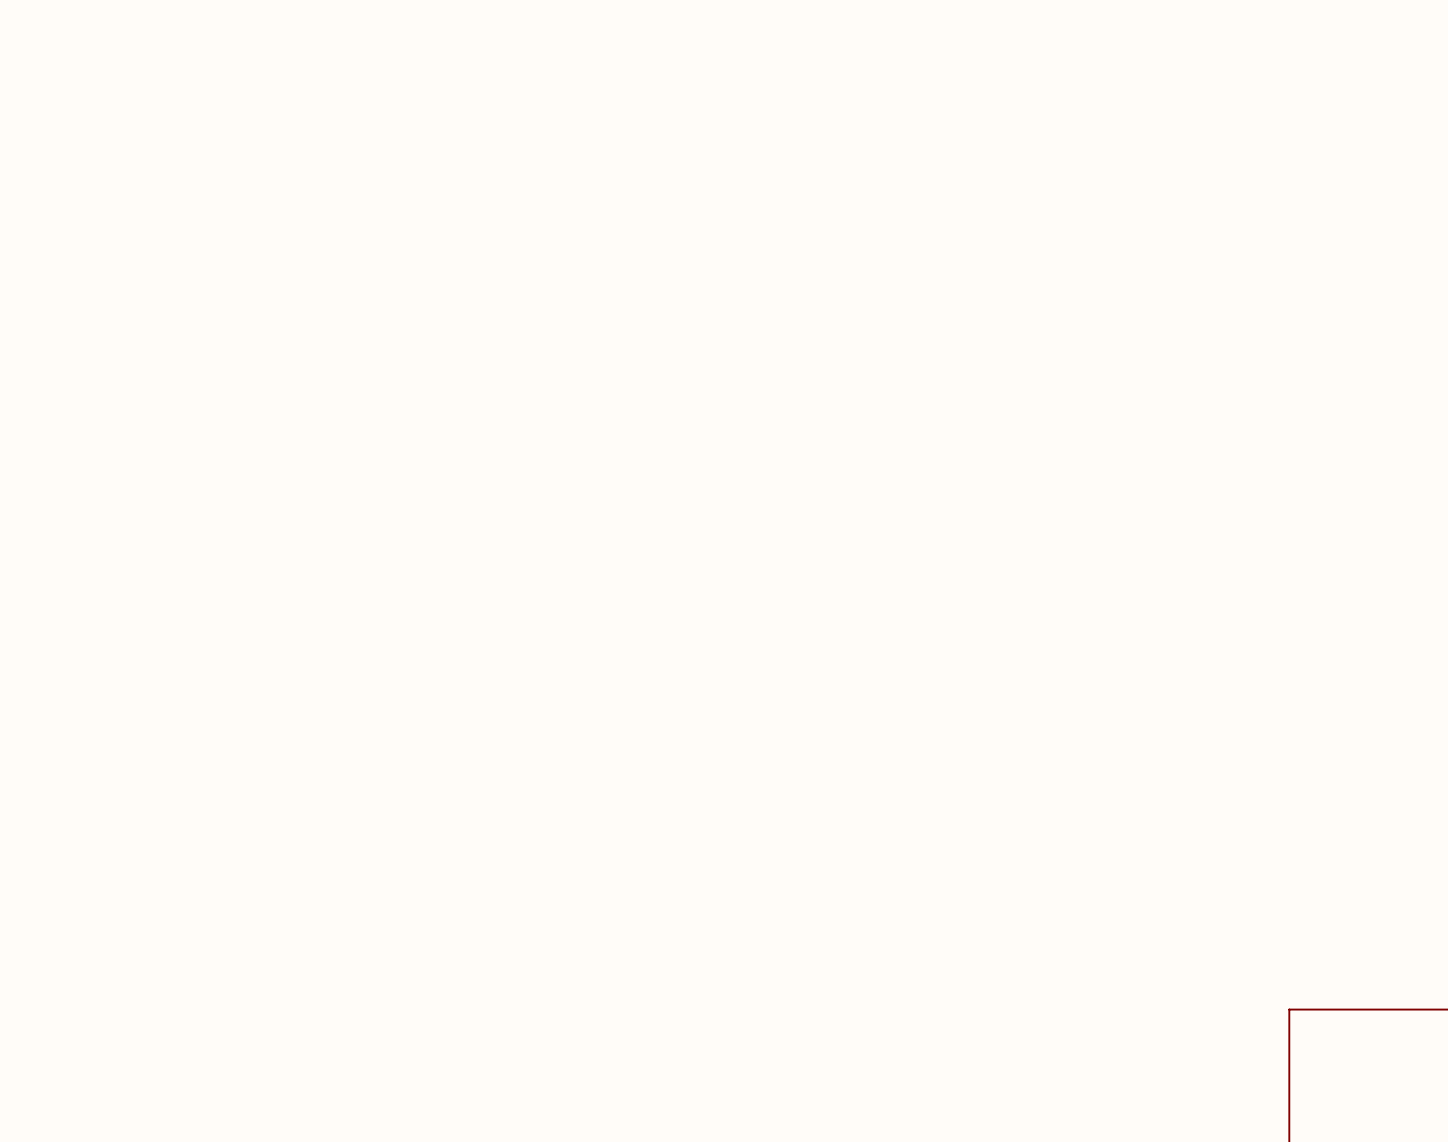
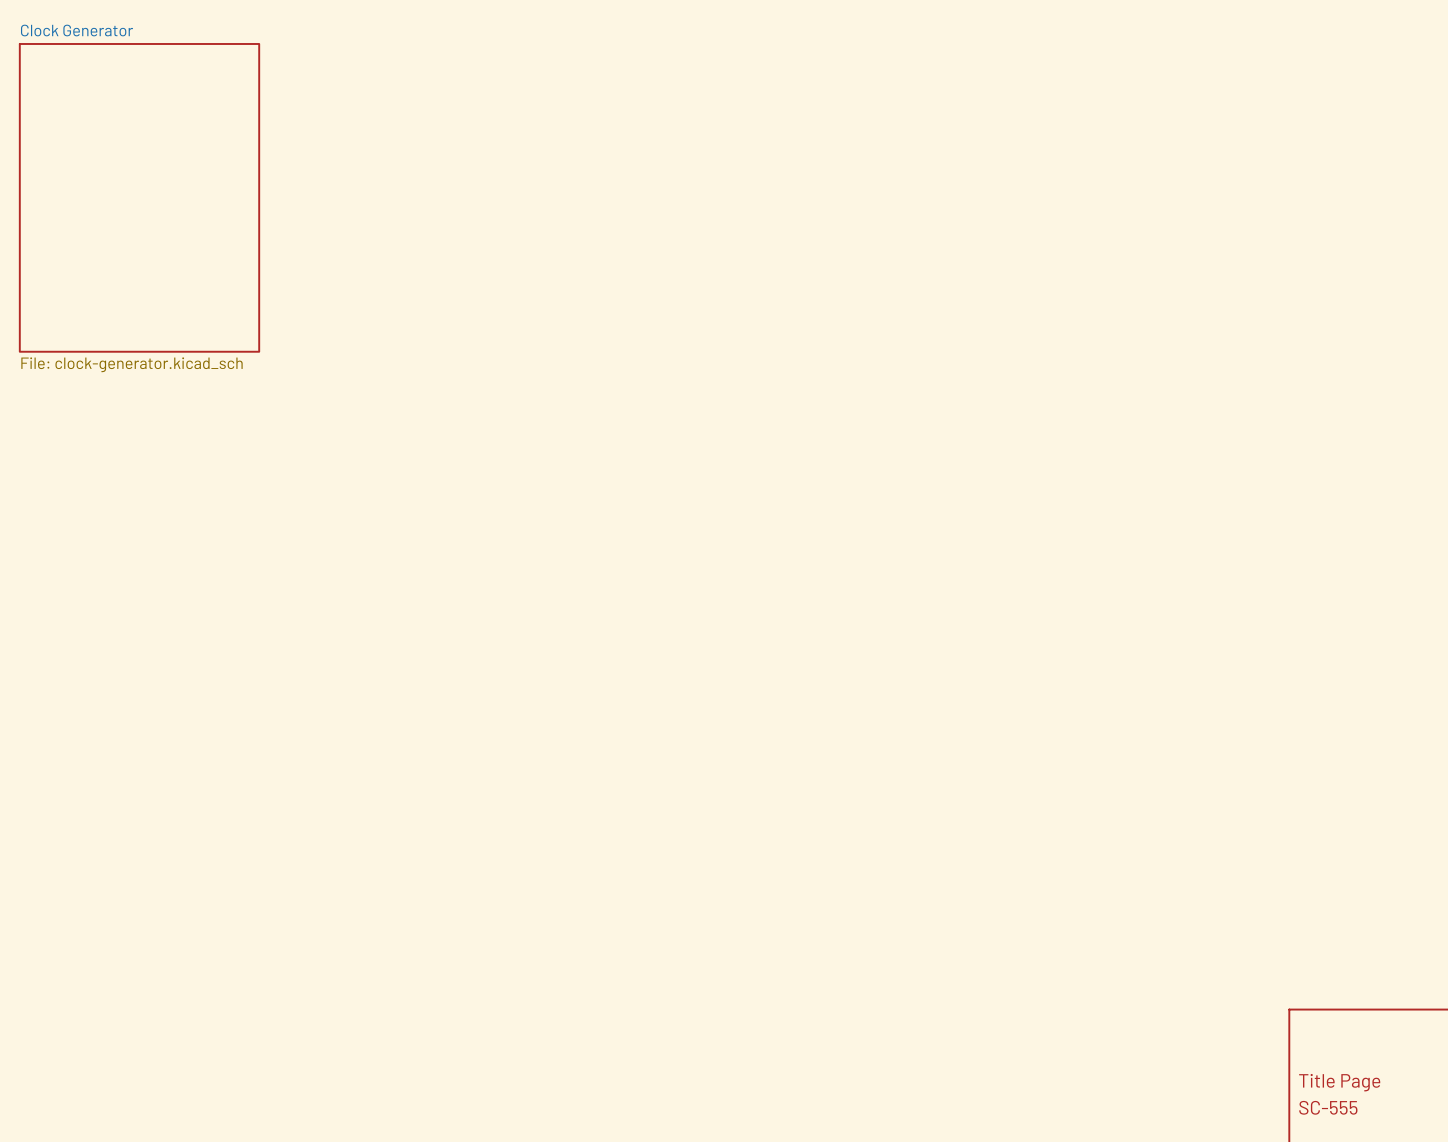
sheet Clock Generator: none -> File: clock-generator.kicad_sch (139, 197)
title block: none -> Title Page (1339, 1082)
title block: none -> SC-555 (1328, 1107)

